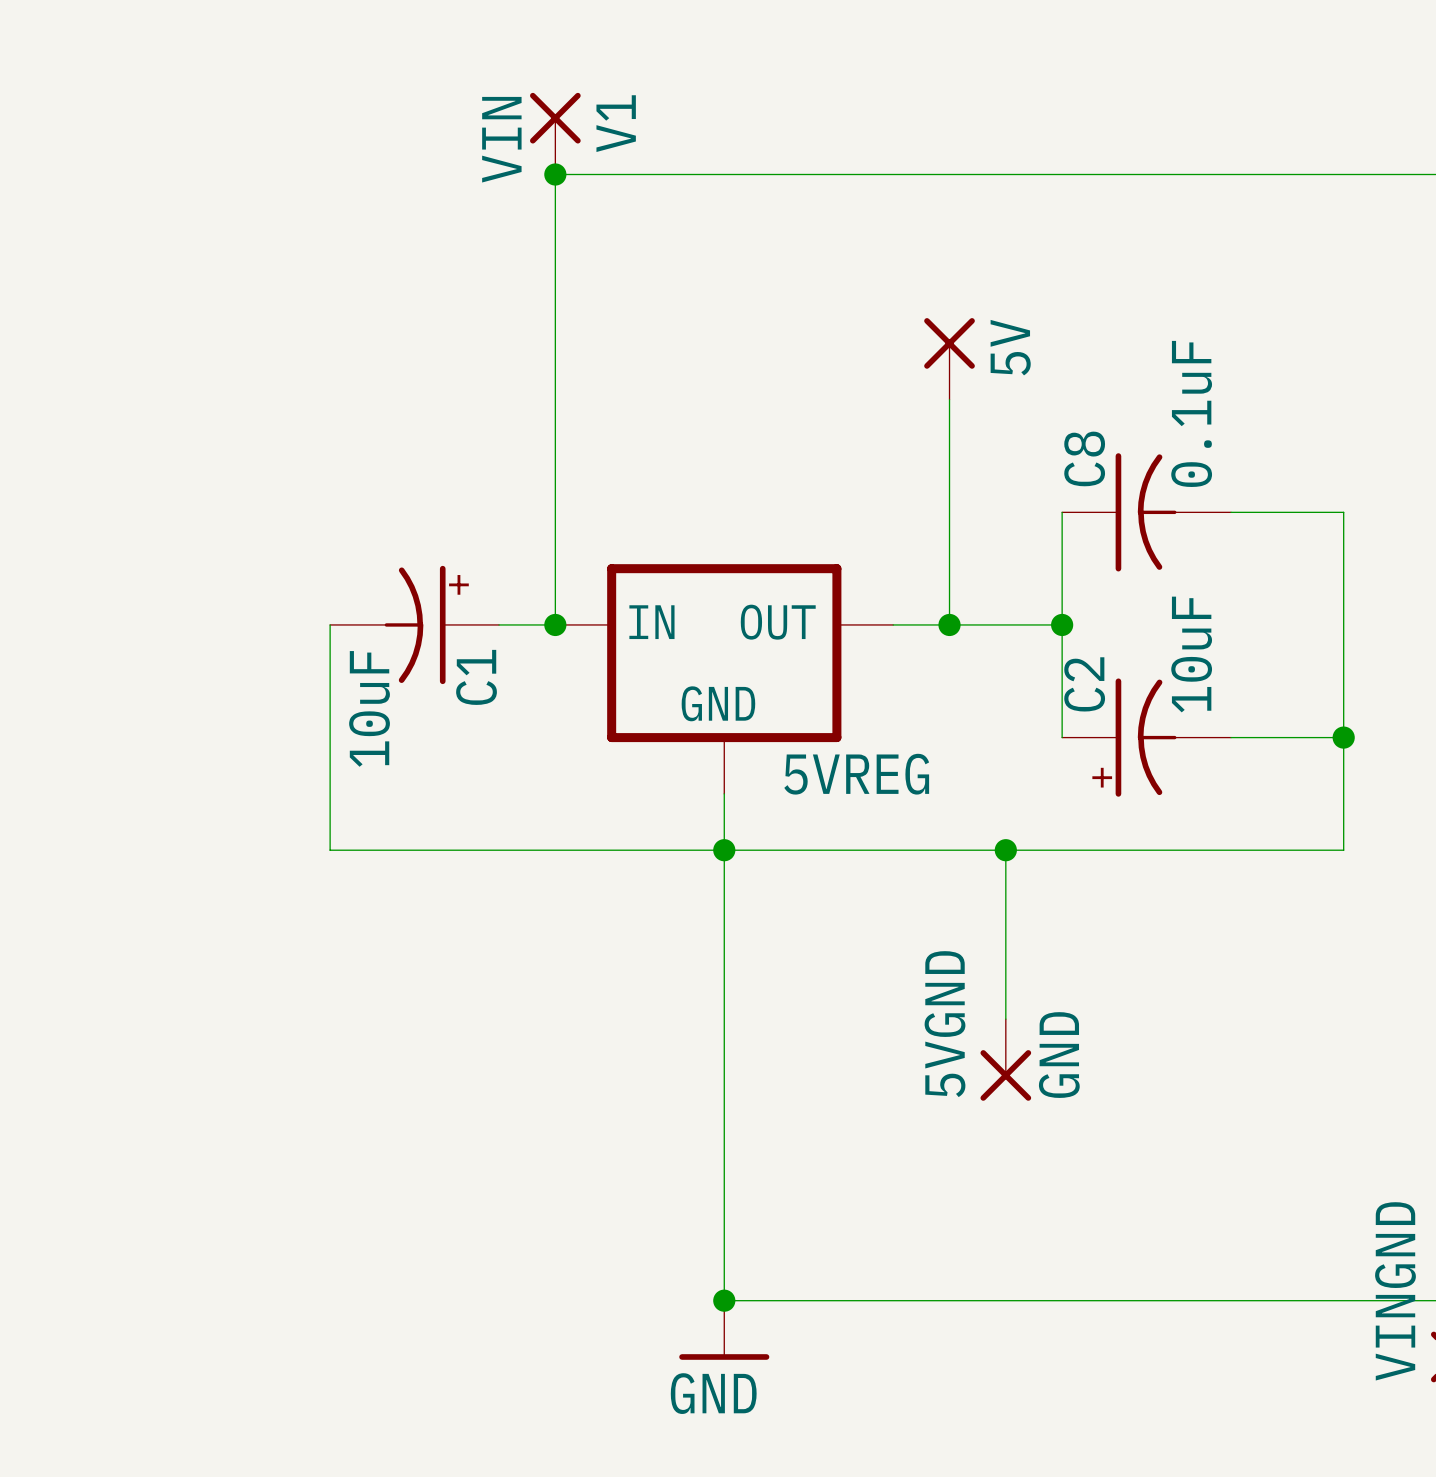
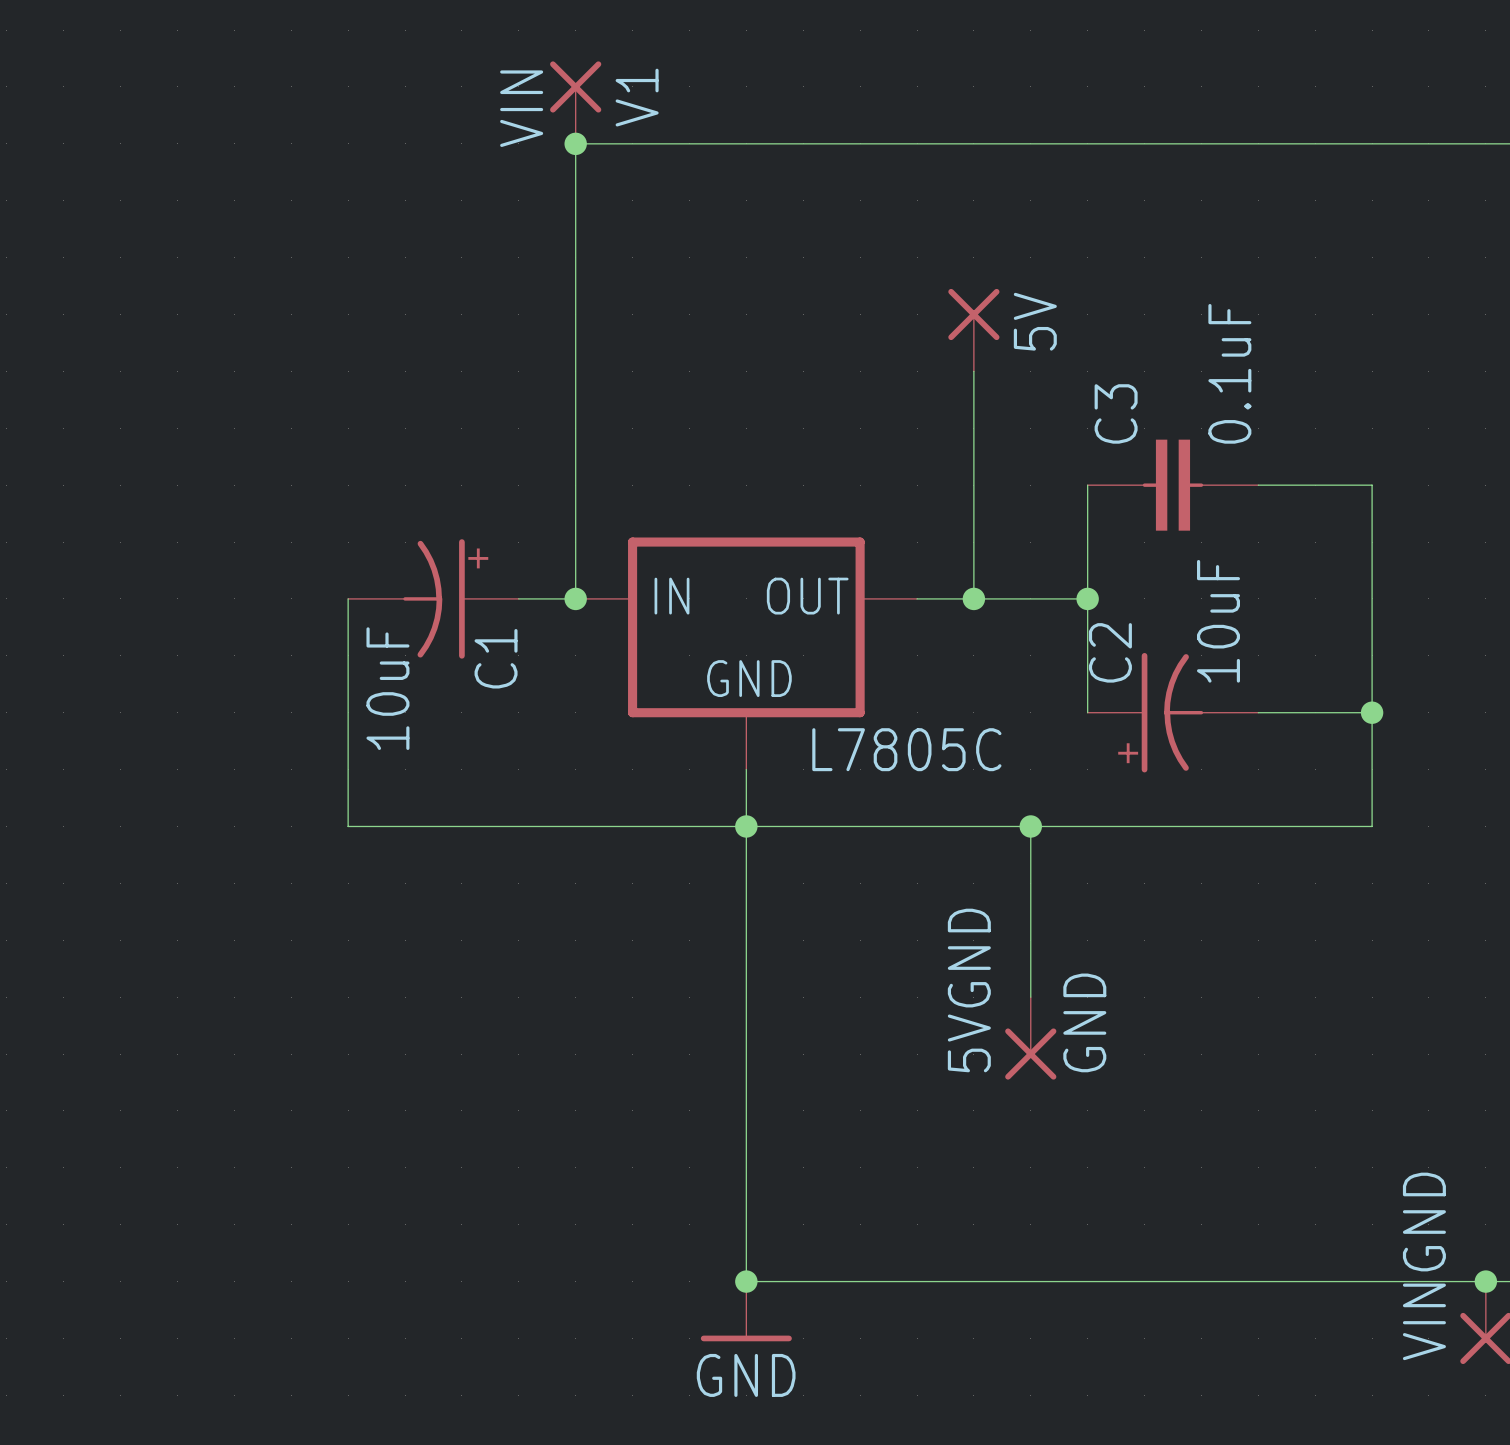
C8: 0.1uF (1146, 512) -> none
C3: none -> 0.1uF (1172, 485)
5VREG name: 5VREG (856, 774) -> L7805C (906, 749)

